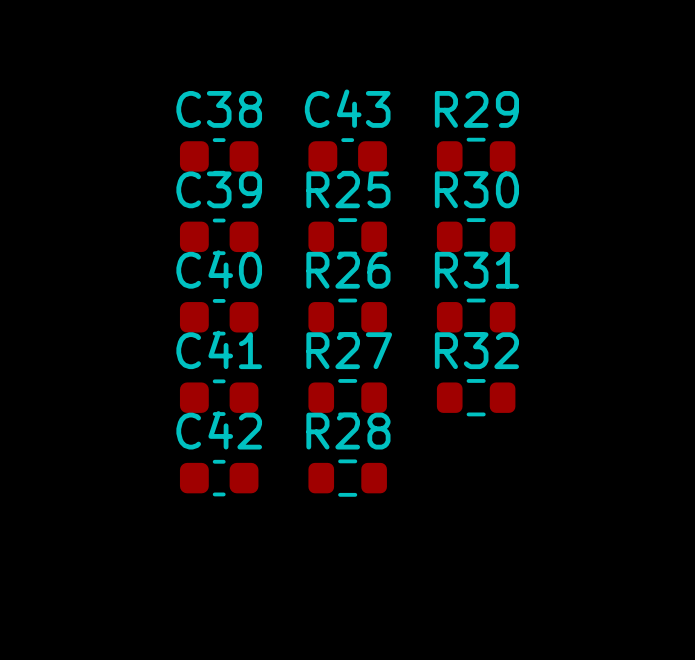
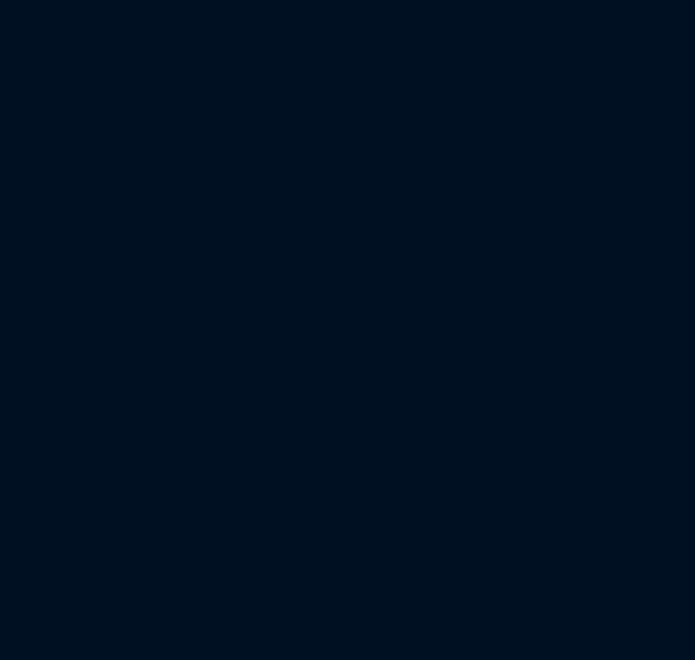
C38: (219, 156) -> none
C43: (347, 156) -> none
R29: (476, 156) -> none
C39: (219, 236) -> none
R25: (347, 236) -> none
R30: (476, 236) -> none
C40: (219, 317) -> none
R26: (347, 317) -> none
R31: (476, 317) -> none
C41: (219, 397) -> none
R27: (347, 397) -> none
R32: (476, 397) -> none
C42: (219, 478) -> none
R28: (347, 478) -> none

